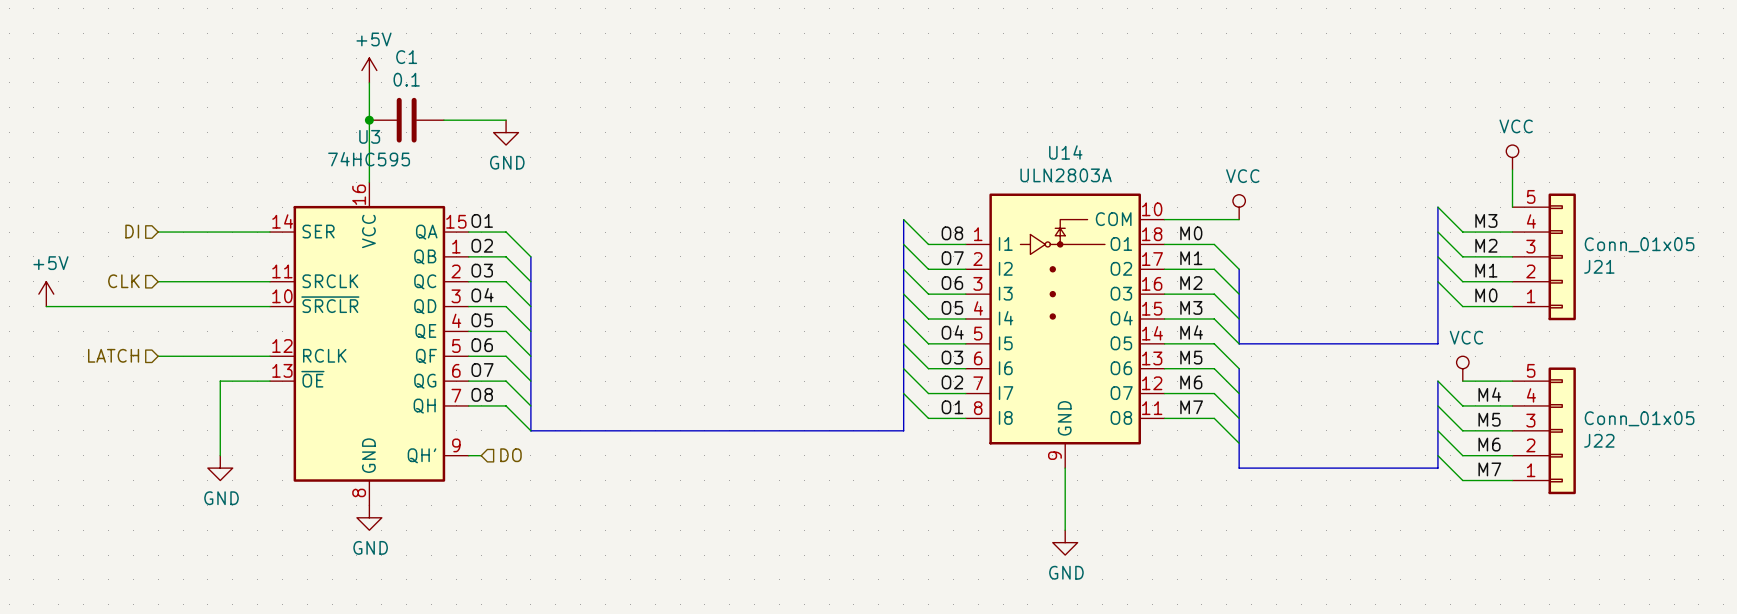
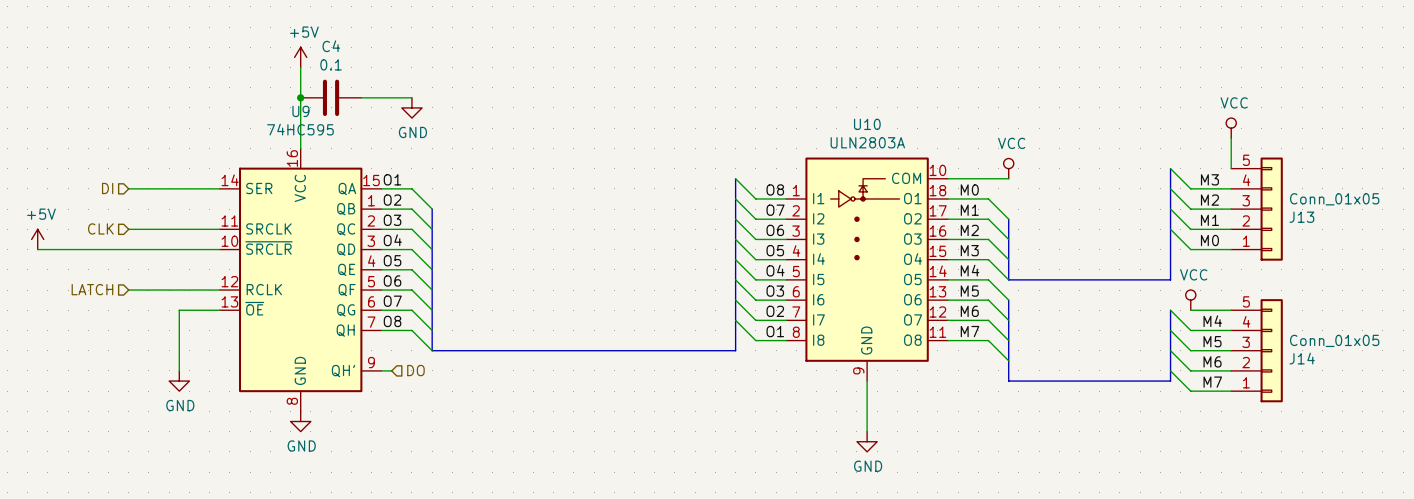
C1 name: C1 (406, 57) -> C4 (331, 46)
U3 name: U3 (369, 136) -> U9 (300, 111)
U14 name: U14 (1065, 152) -> U10 (867, 124)
J21 name: J21 (1599, 266) -> J13 (1301, 217)
J22 name: J22 (1599, 440) -> J14 (1302, 358)

